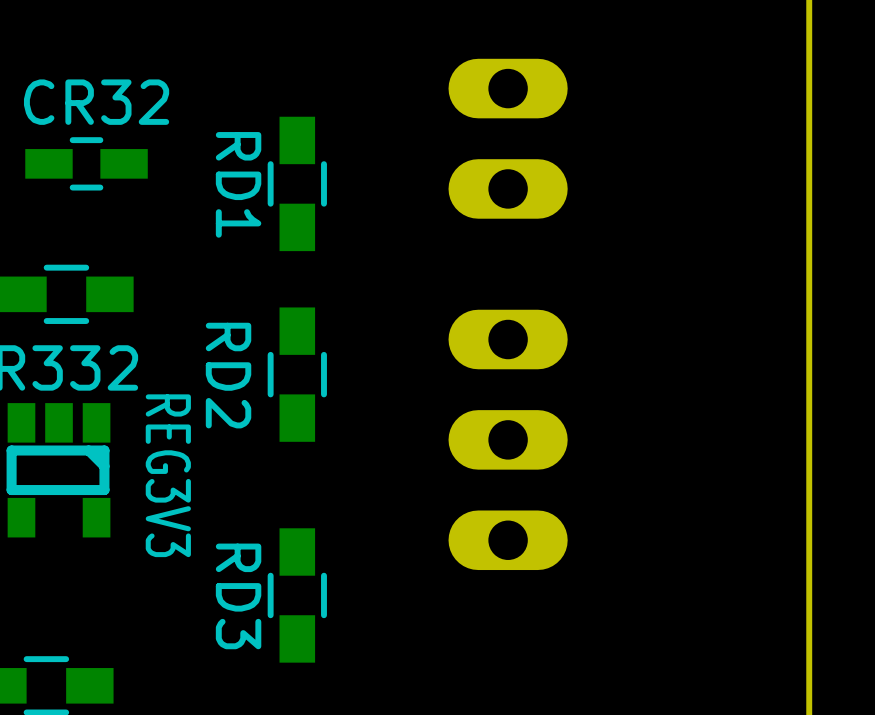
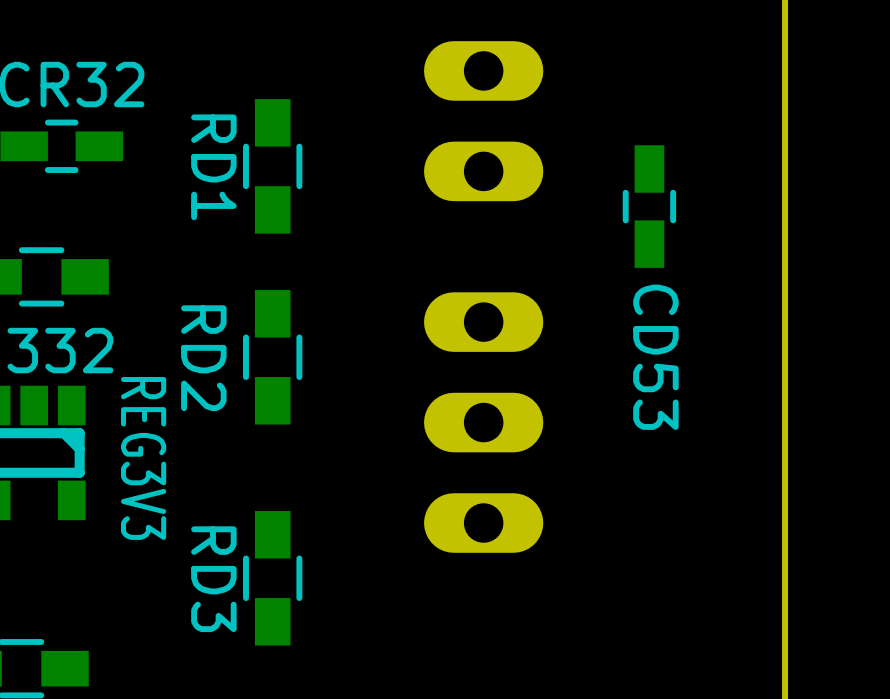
CD53: none -> (649, 206)

